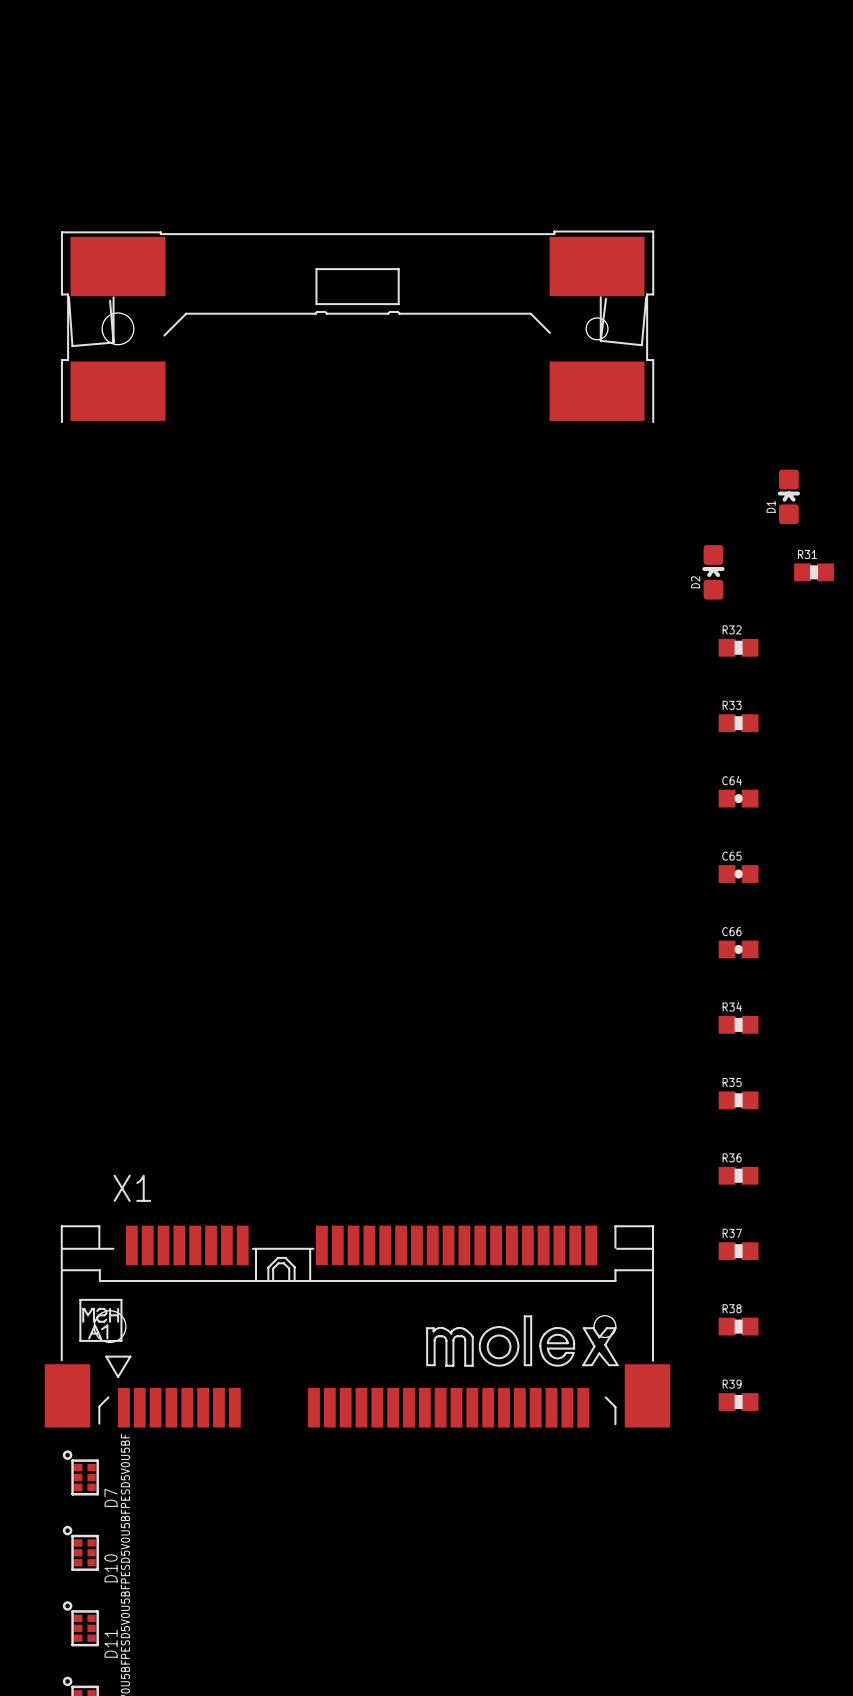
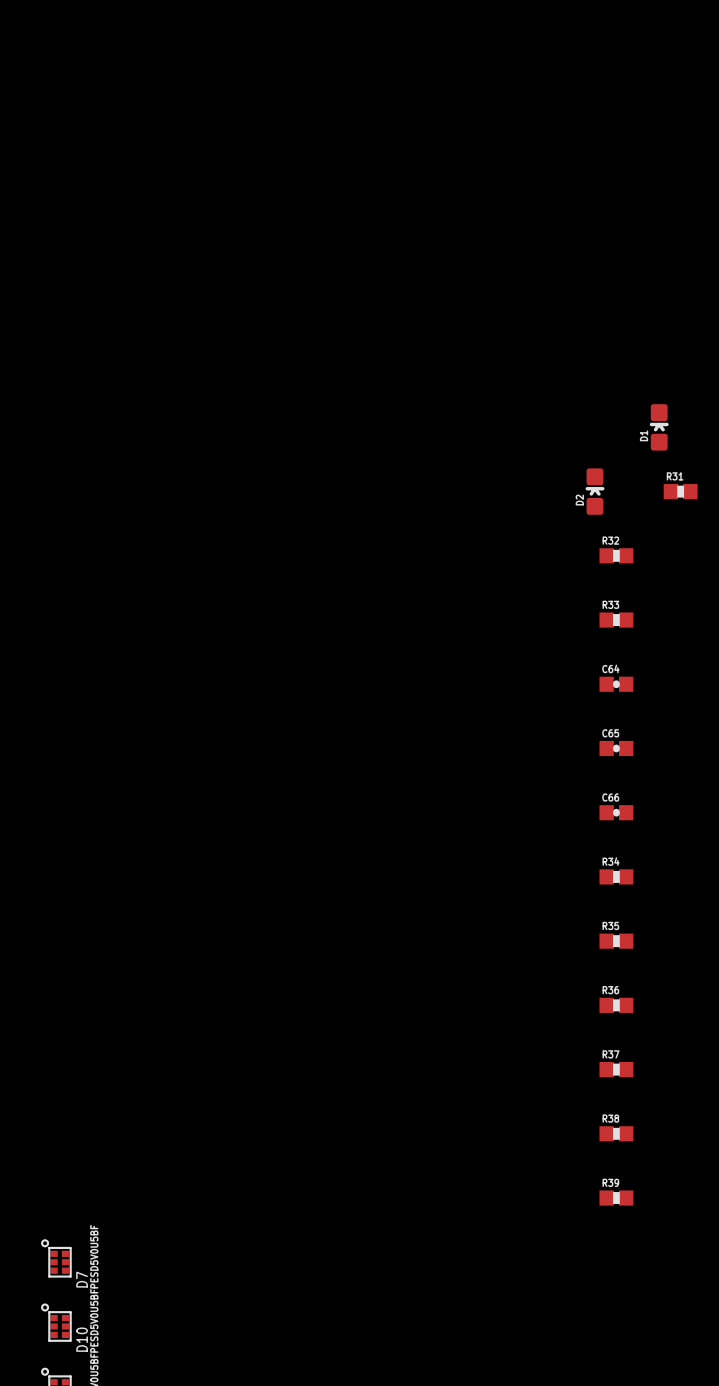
X1: (357, 829) -> none

